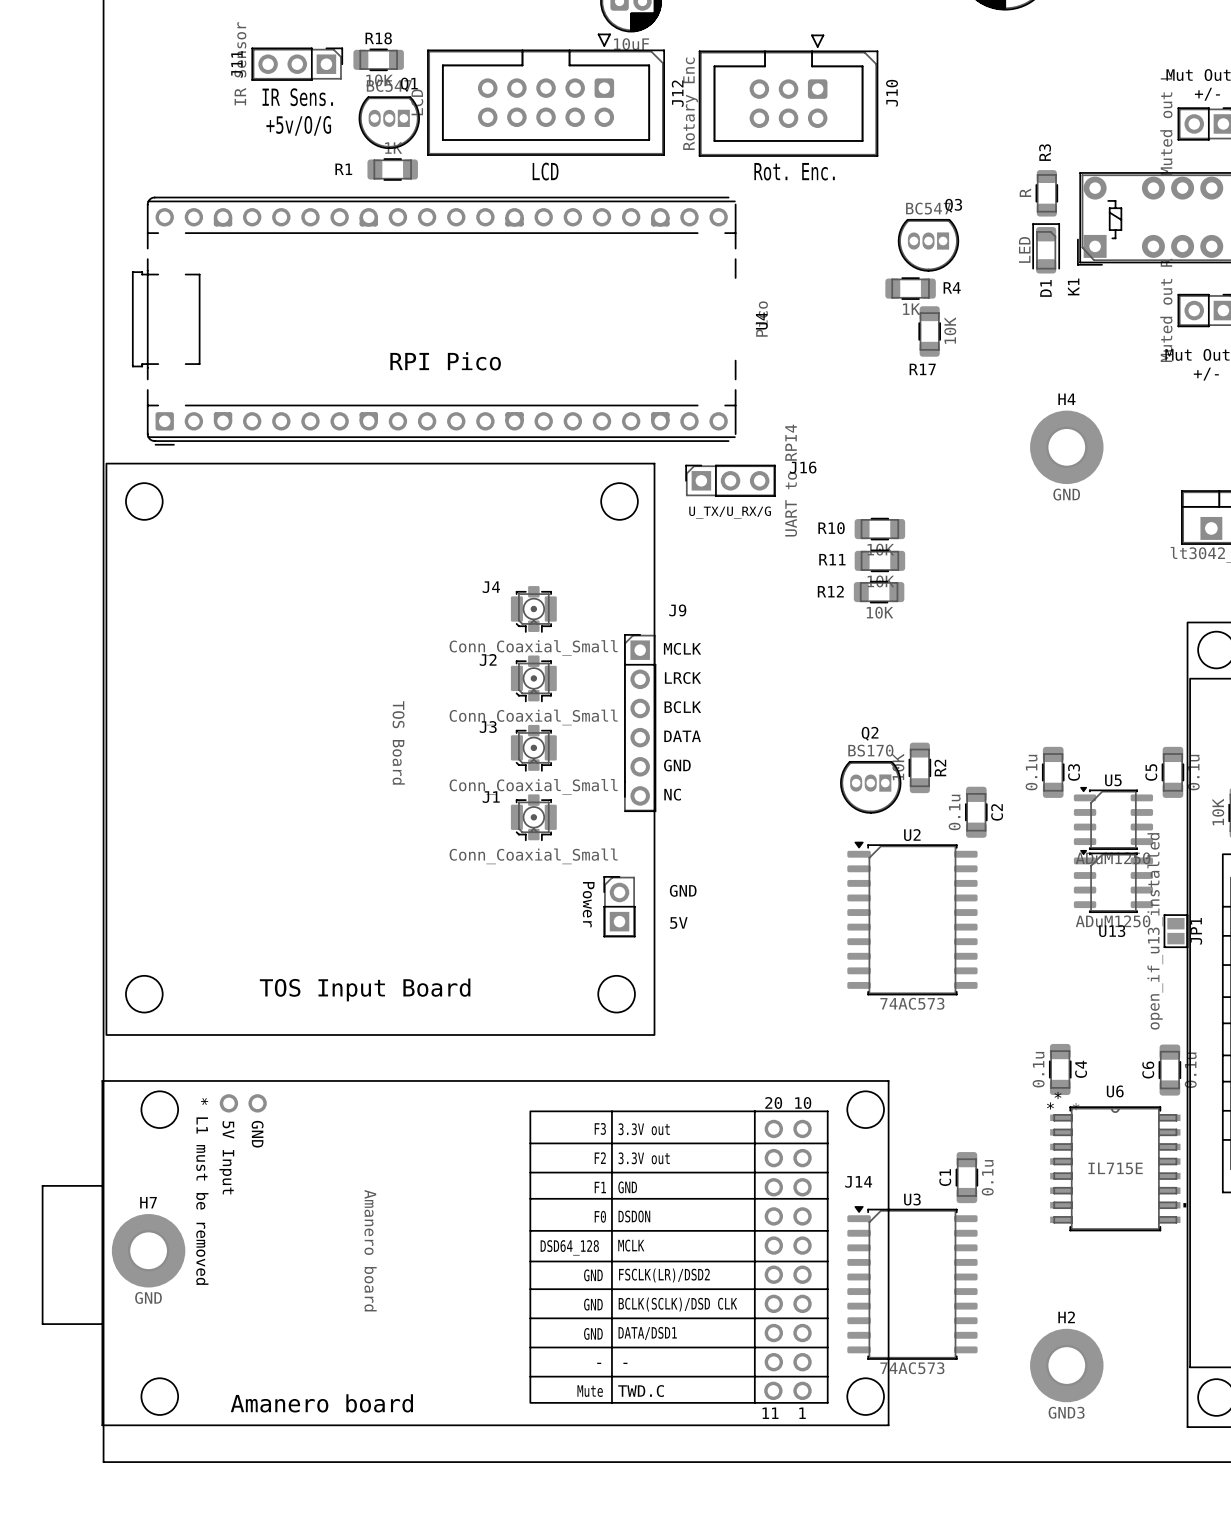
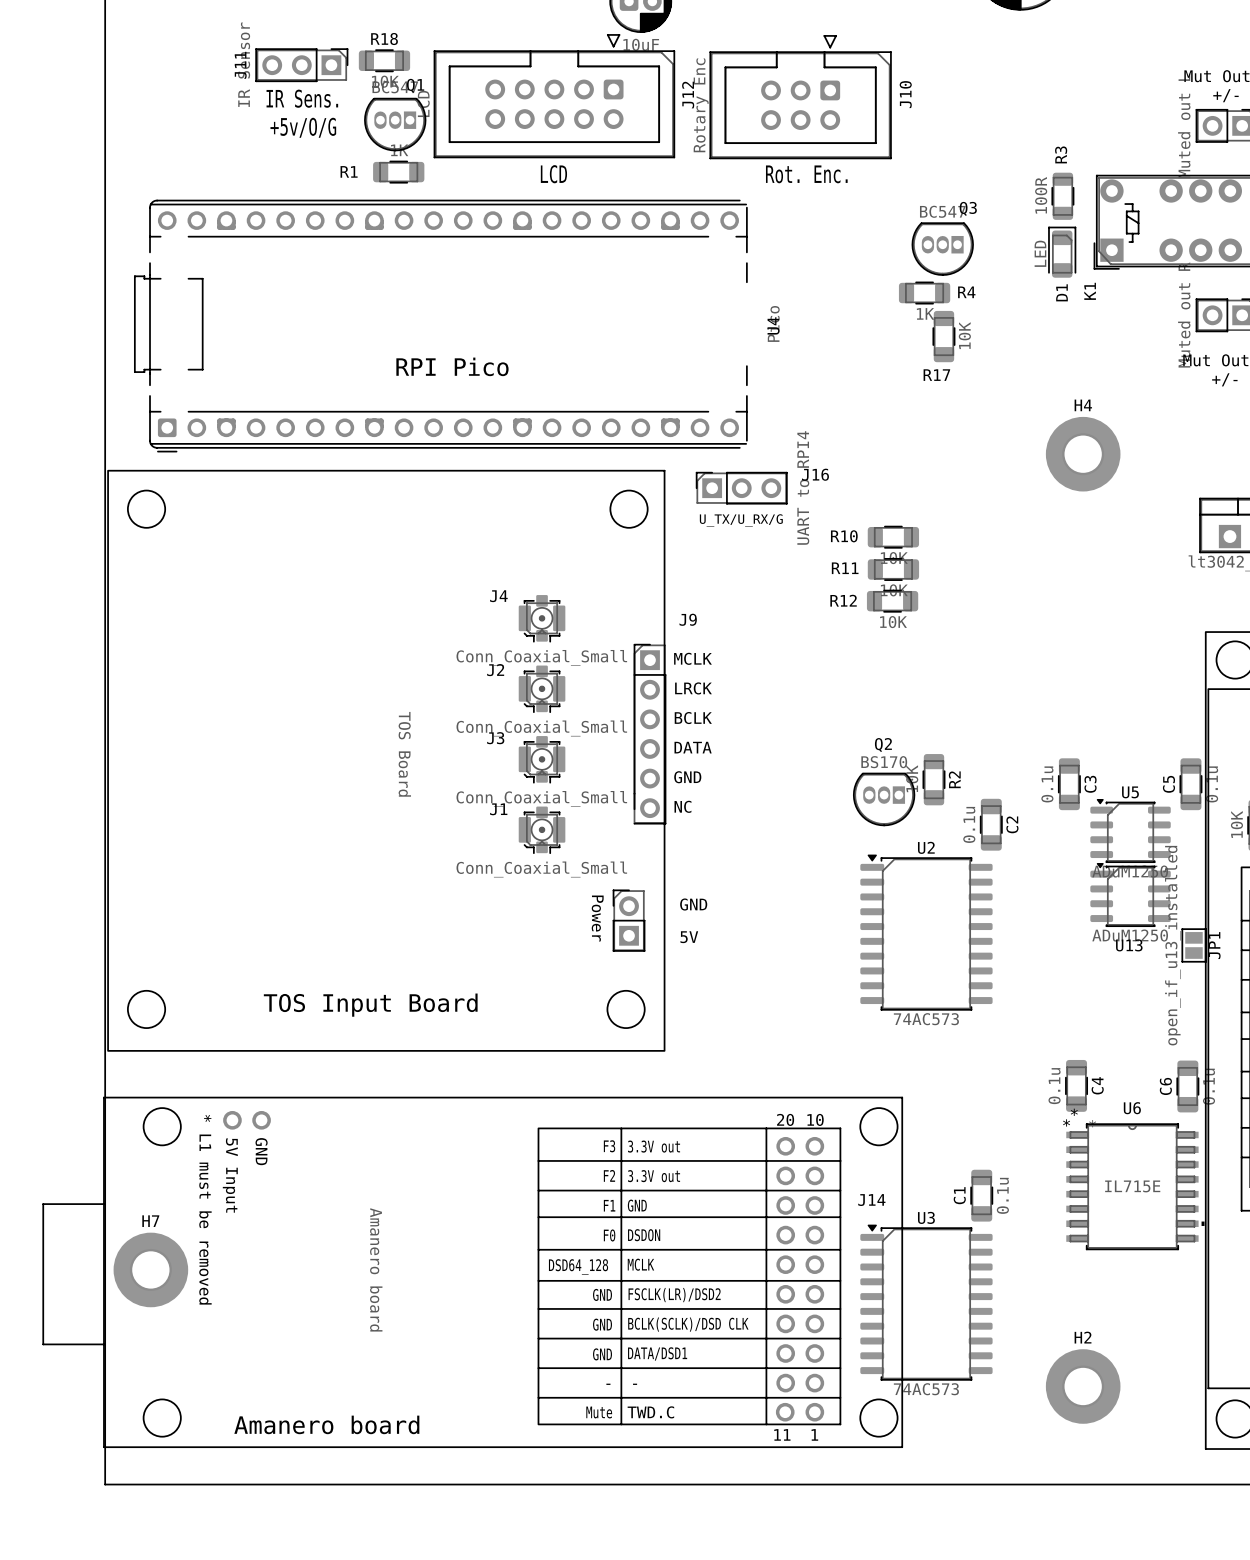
R3 value: R (1025, 192) -> 100R (1041, 195)
H4 value: GND (1066, 494) -> none
H7 value: GND (148, 1297) -> none
H2 value: GND3 (1066, 1412) -> none

